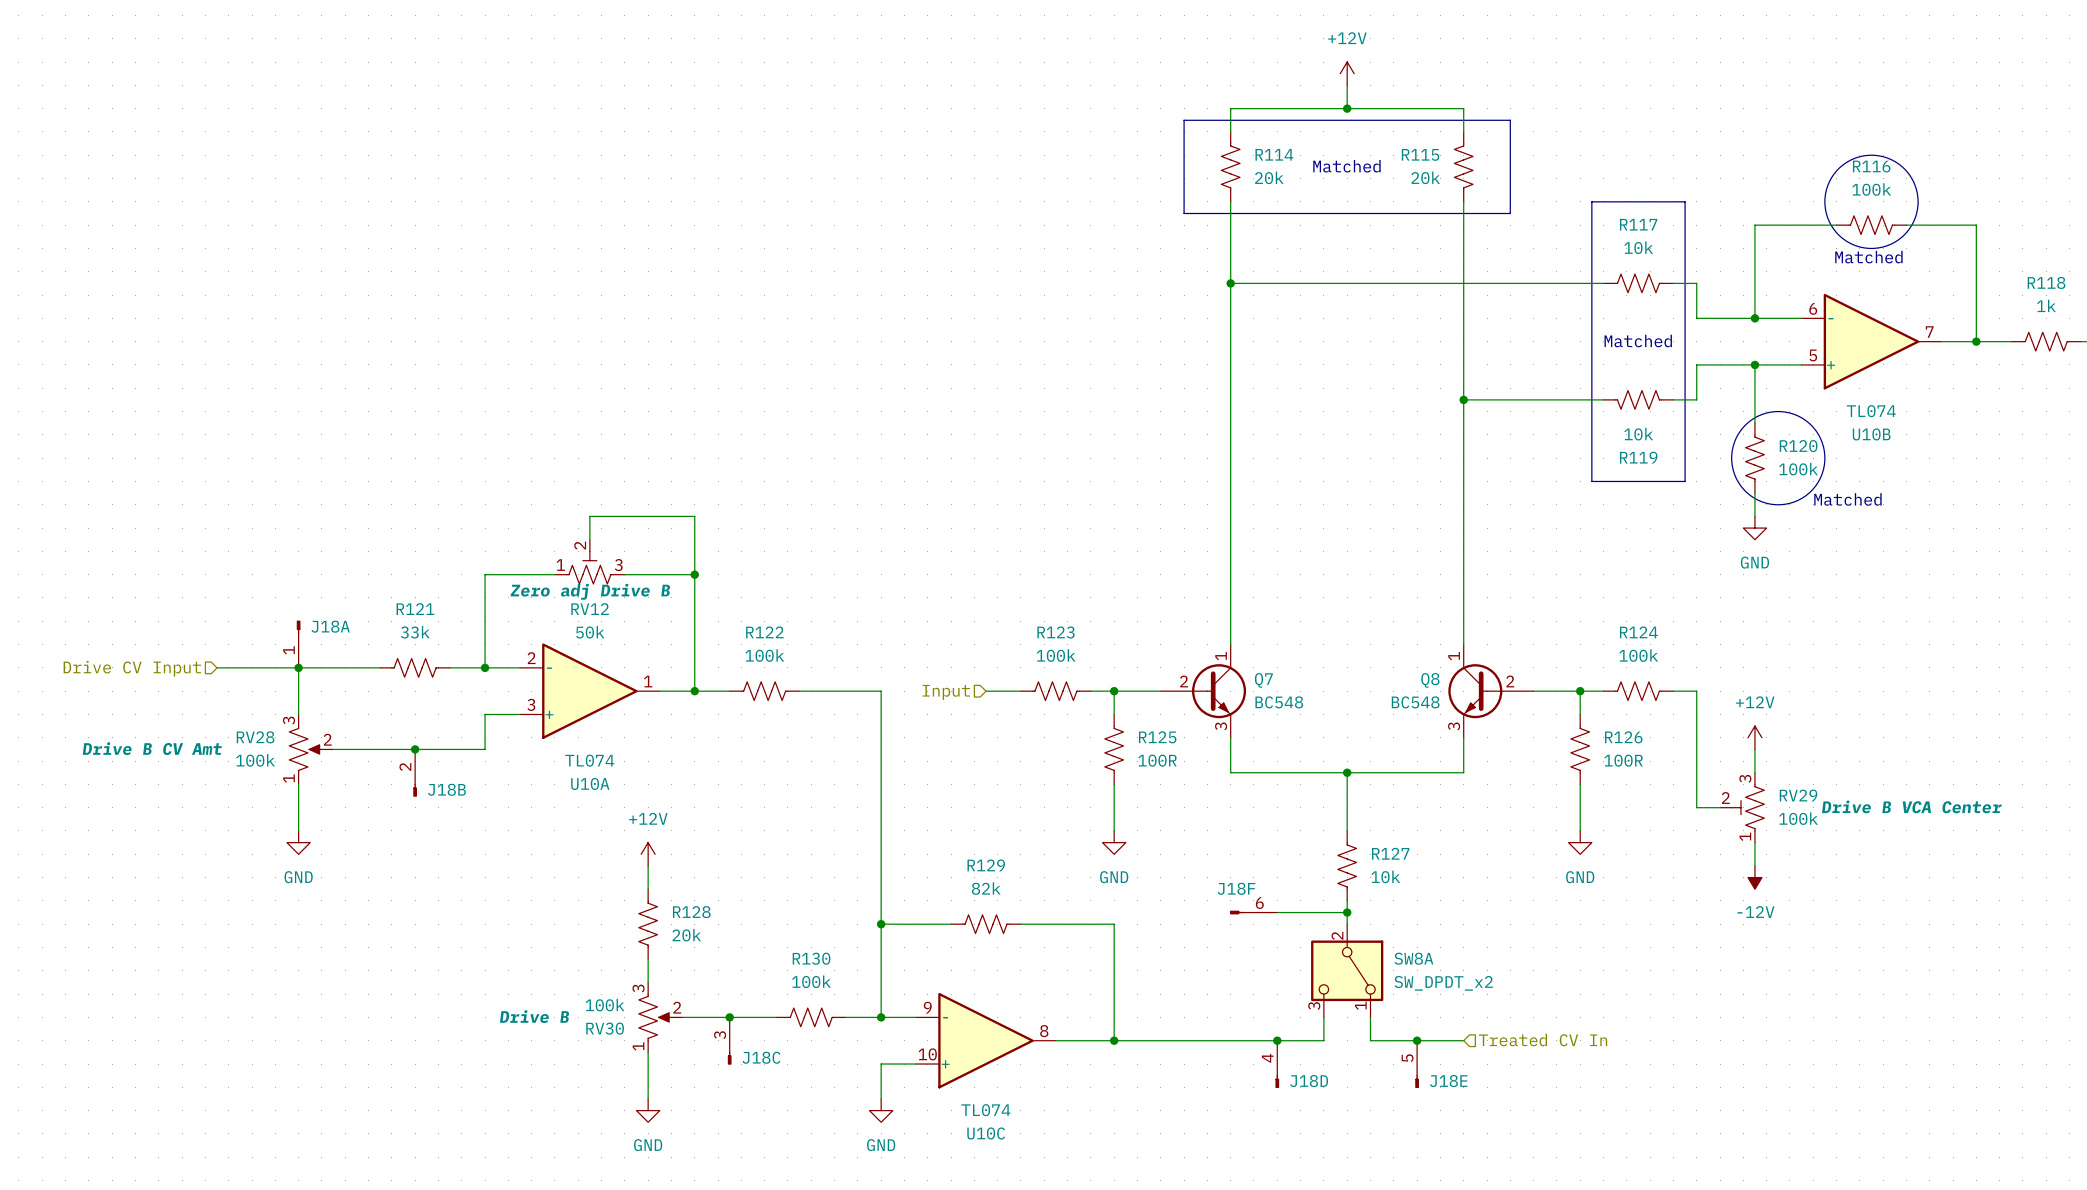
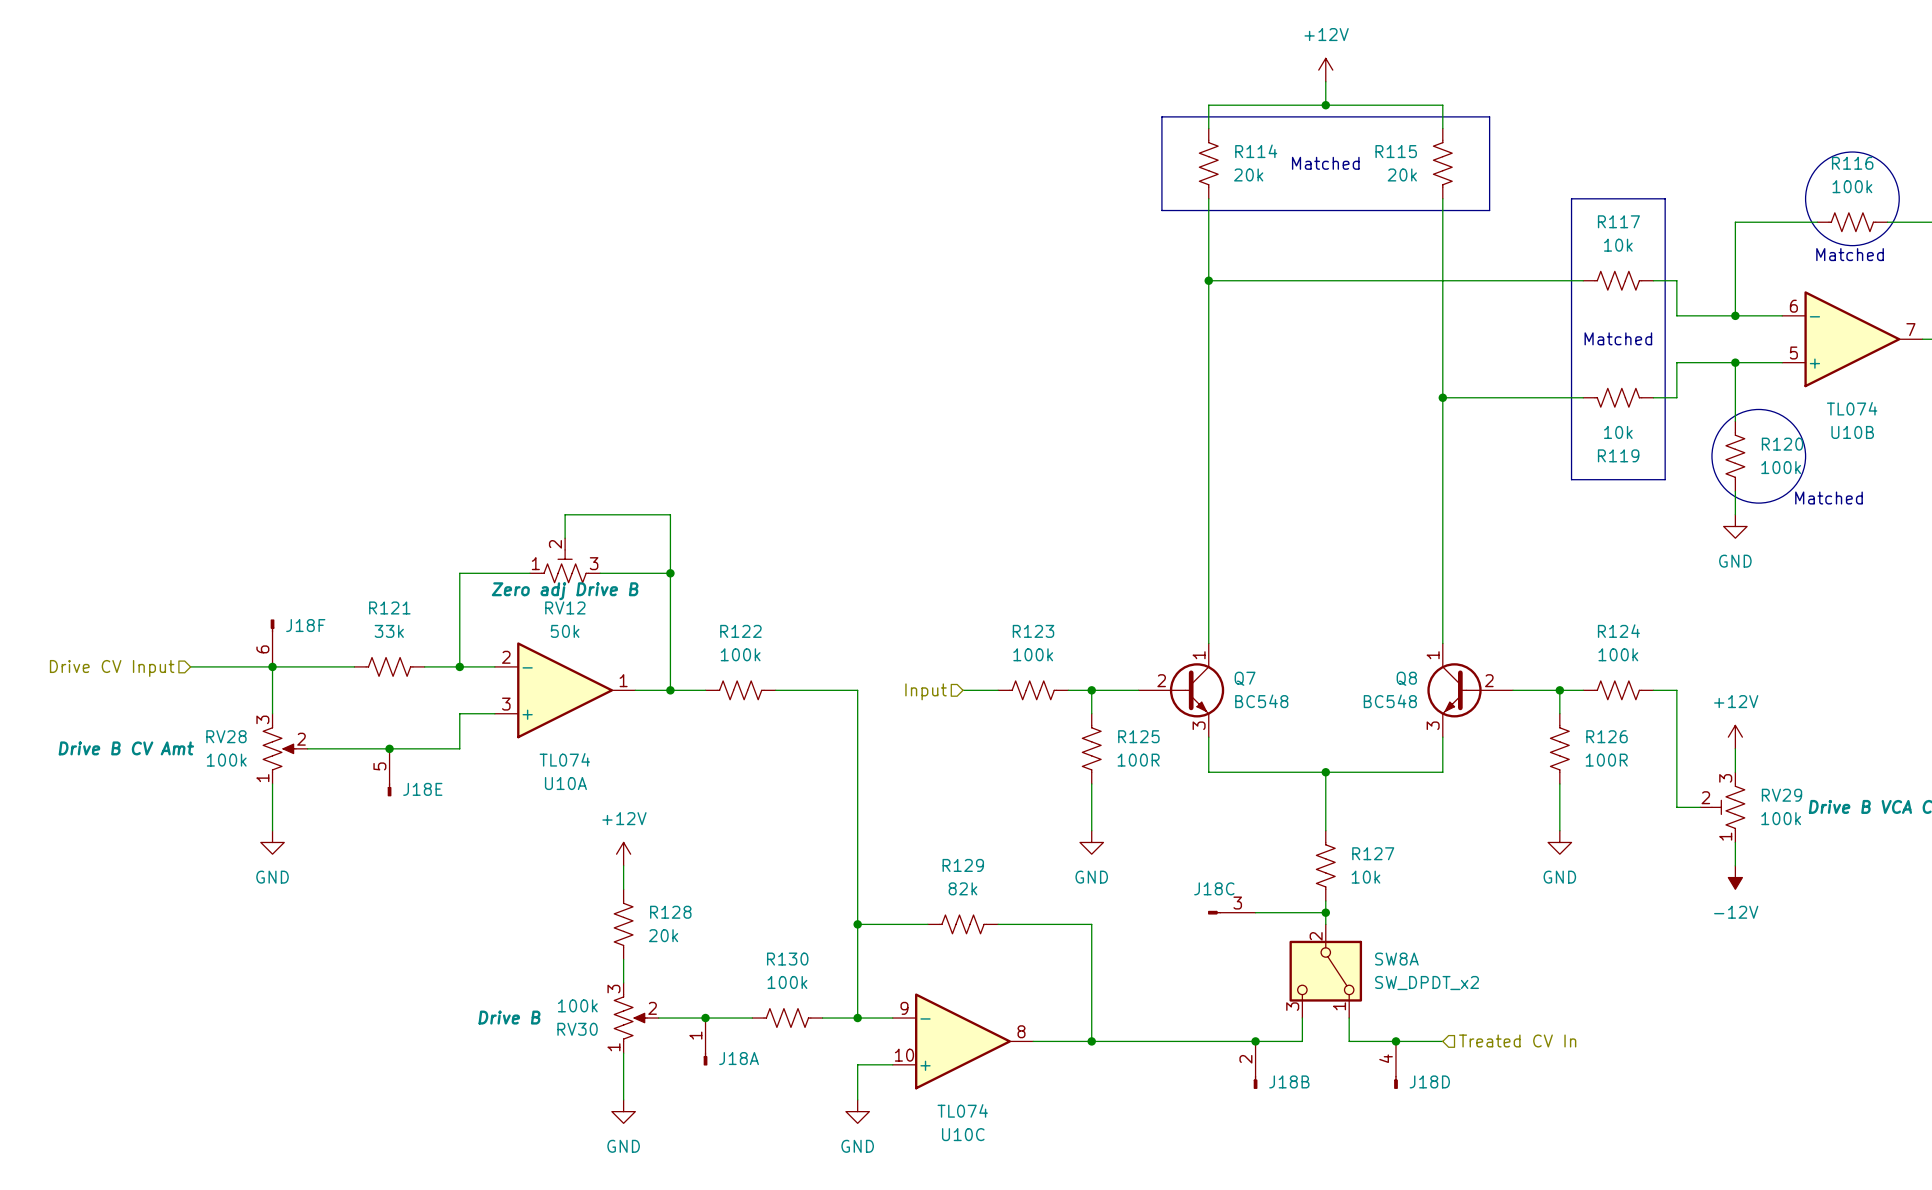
J18A name position: J18A (330, 626) -> J18A (739, 1058)
J18A rotation: 0° (298, 627) -> 180° (705, 1058)
J18A position: (298, 644) -> (705, 1041)
J18B position: (415, 773) -> (1255, 1065)
J18F rotation: 0° (1236, 912) -> 90° clockwise (272, 625)
J18F position: (1253, 912) -> (272, 643)
J18C position: (729, 1041) -> (1231, 912)
J18C name position: J18C (761, 1057) -> J18C (1214, 888)
J18C rotation: 0° (729, 1058) -> 90° clockwise (1214, 912)
J18D position: (1277, 1064) -> (1395, 1065)
J18E position: (1417, 1064) -> (389, 772)

